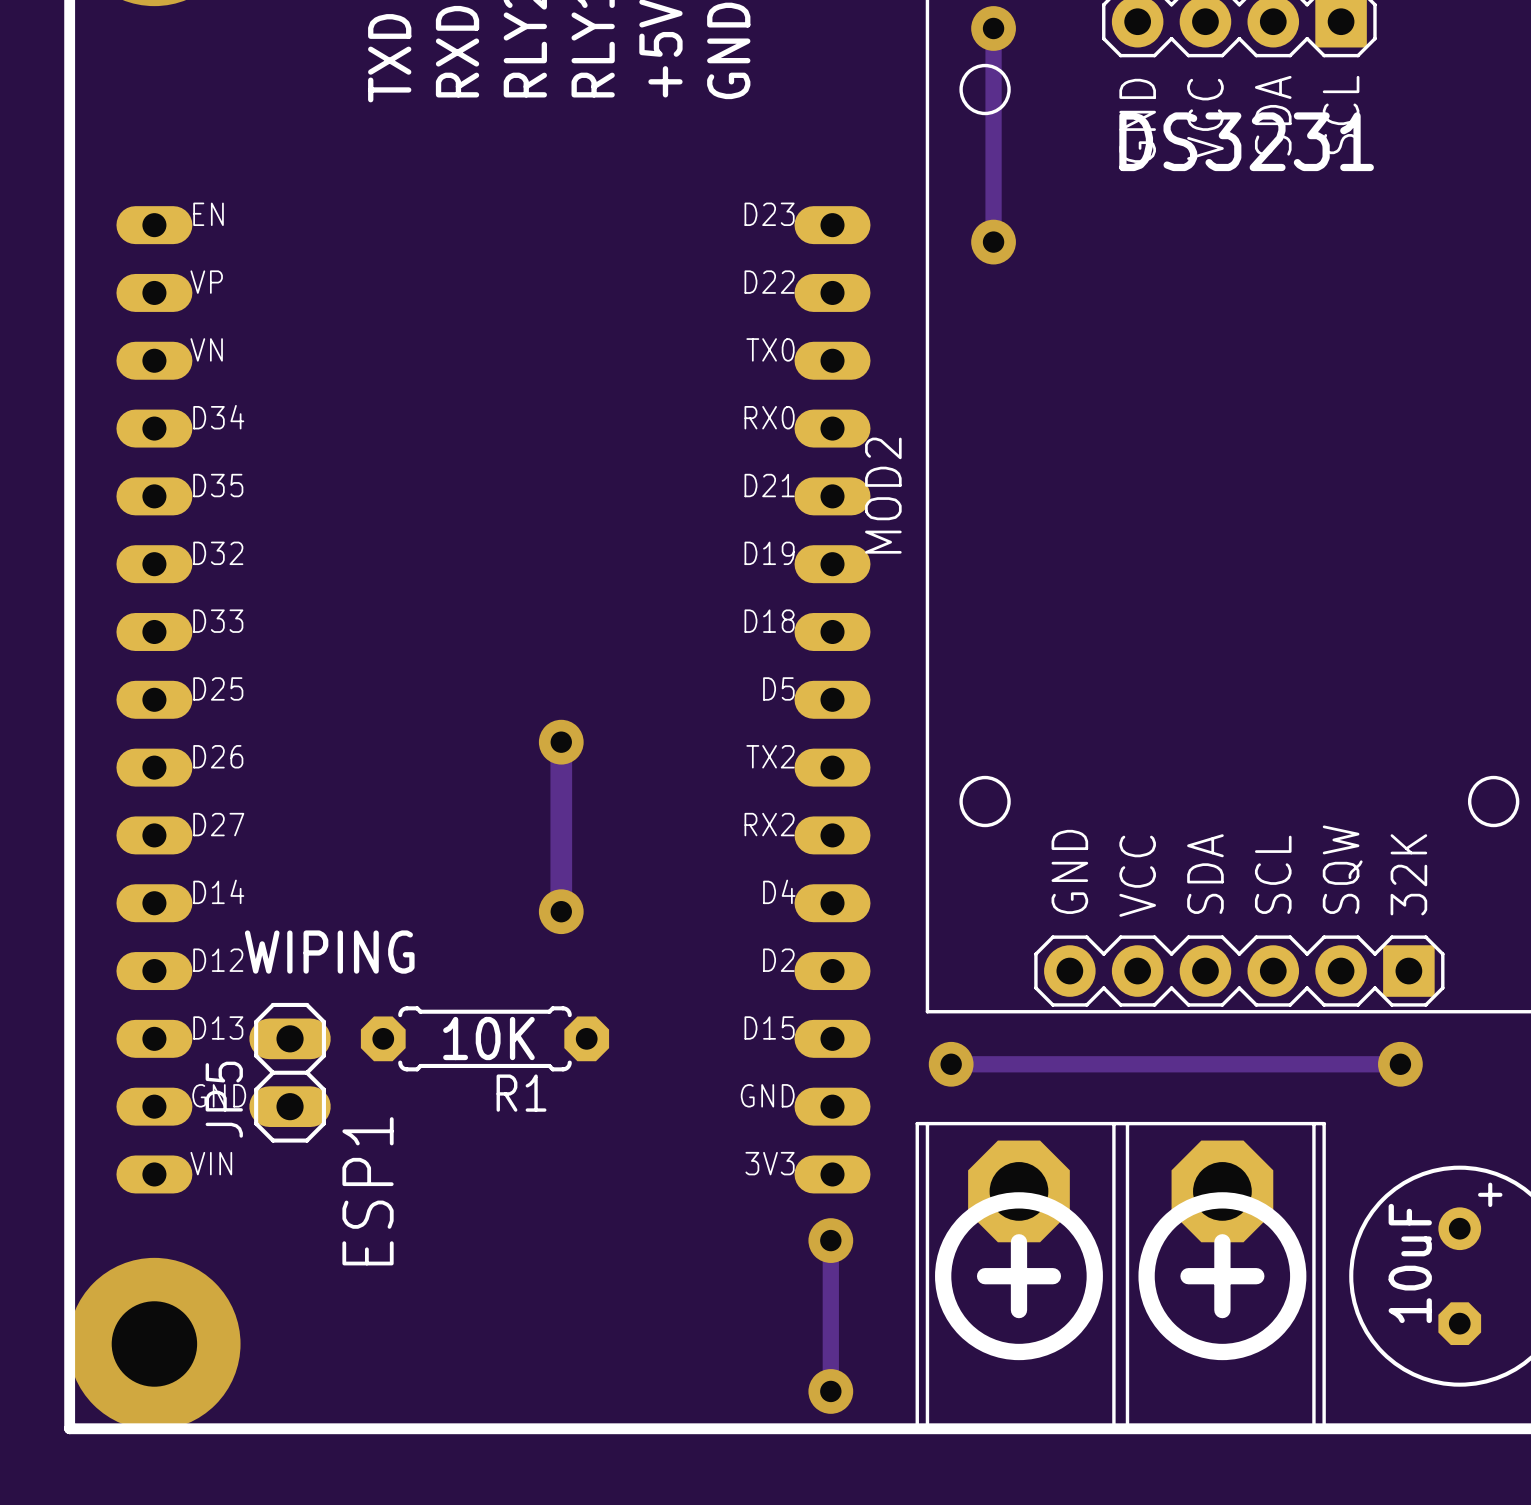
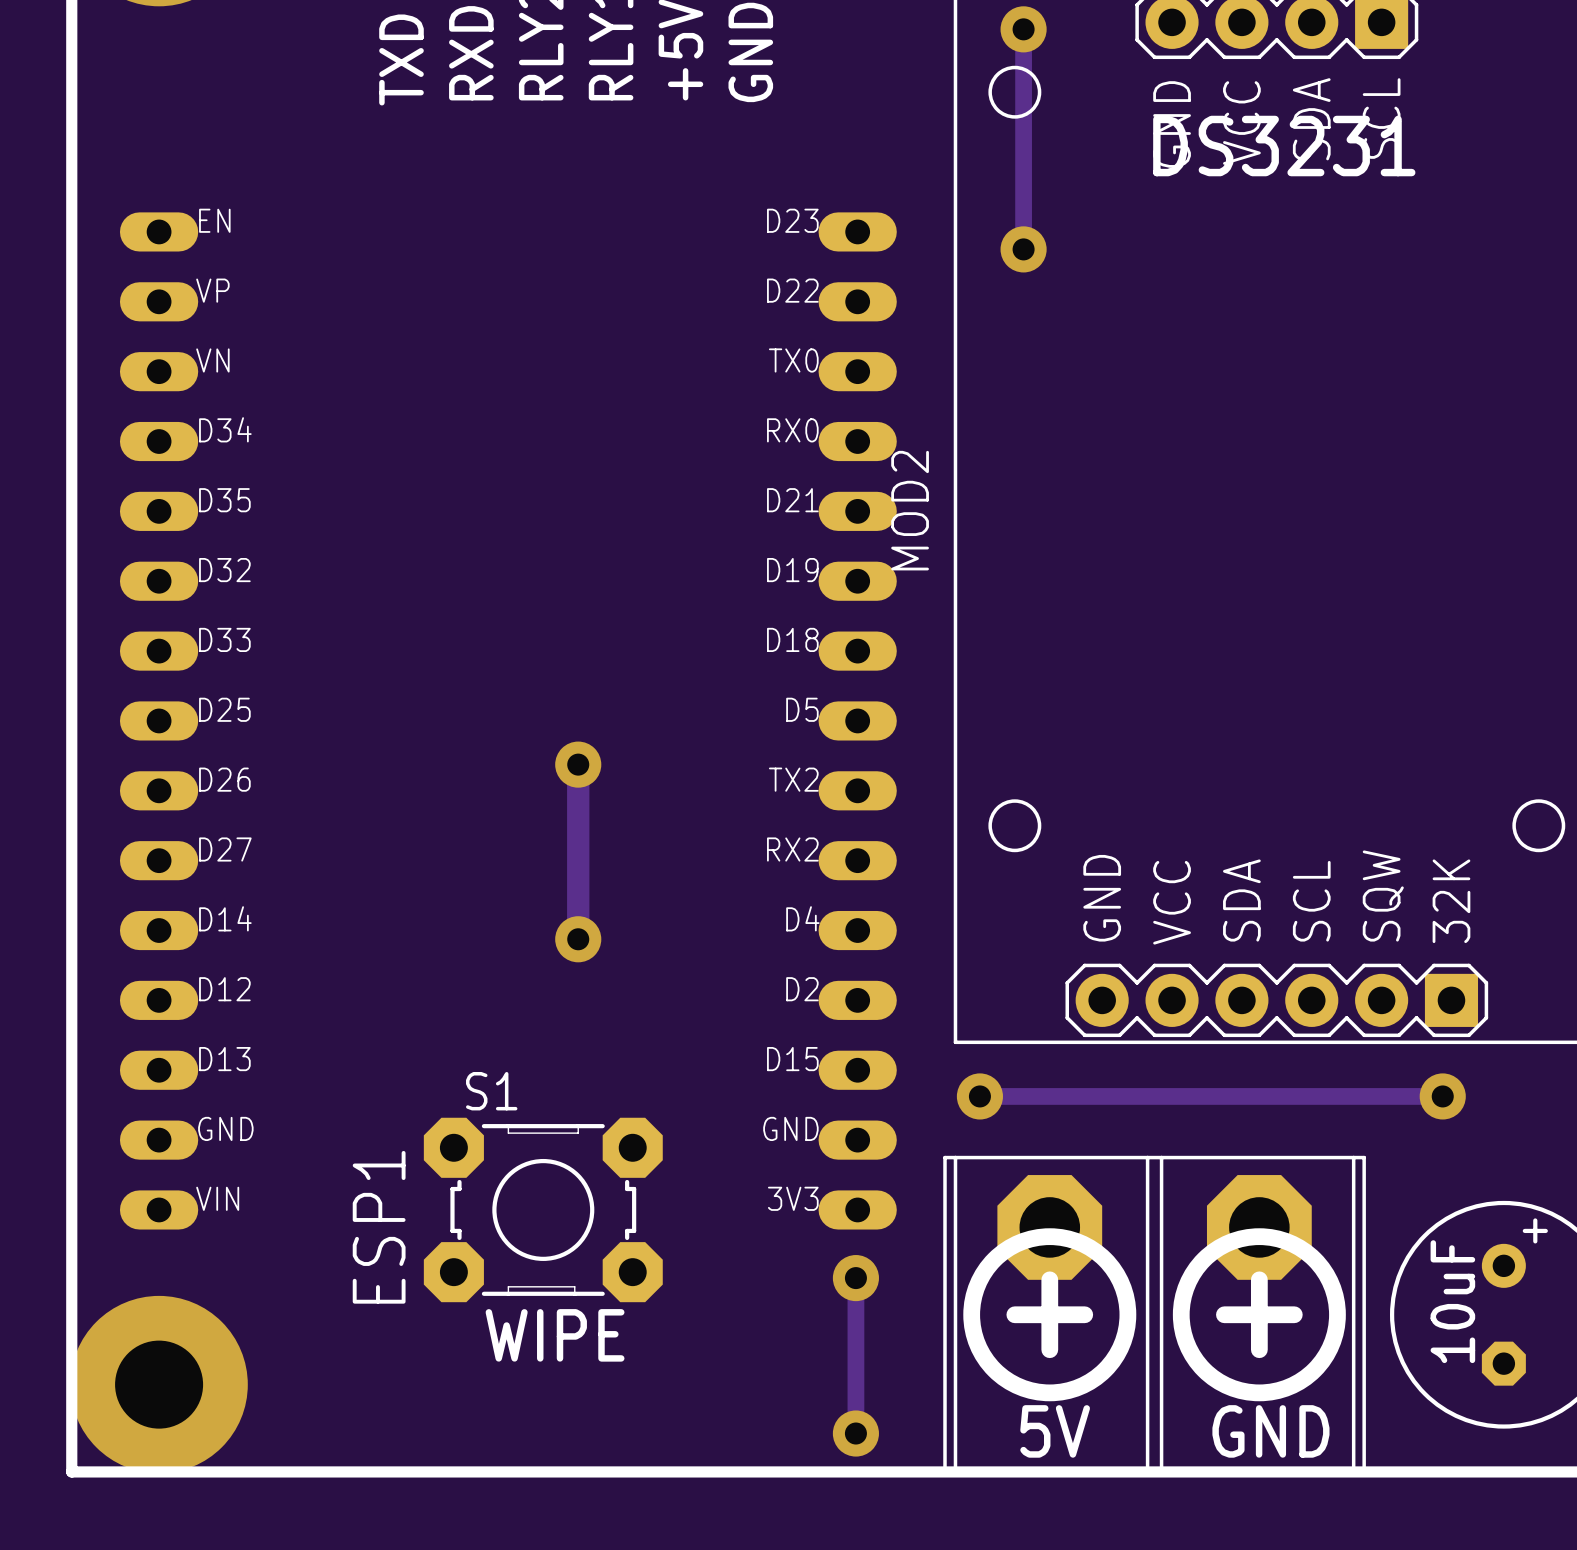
text: WIPING (329, 952) -> none
R1: (484, 1038) -> none
text: 10K (488, 1038) -> none
JP5: (290, 1072) -> none
S1: none -> (543, 1209)
text: none -> WIPE (555, 1335)
text: none -> 5V (1055, 1431)
text: none -> GND (1270, 1431)

